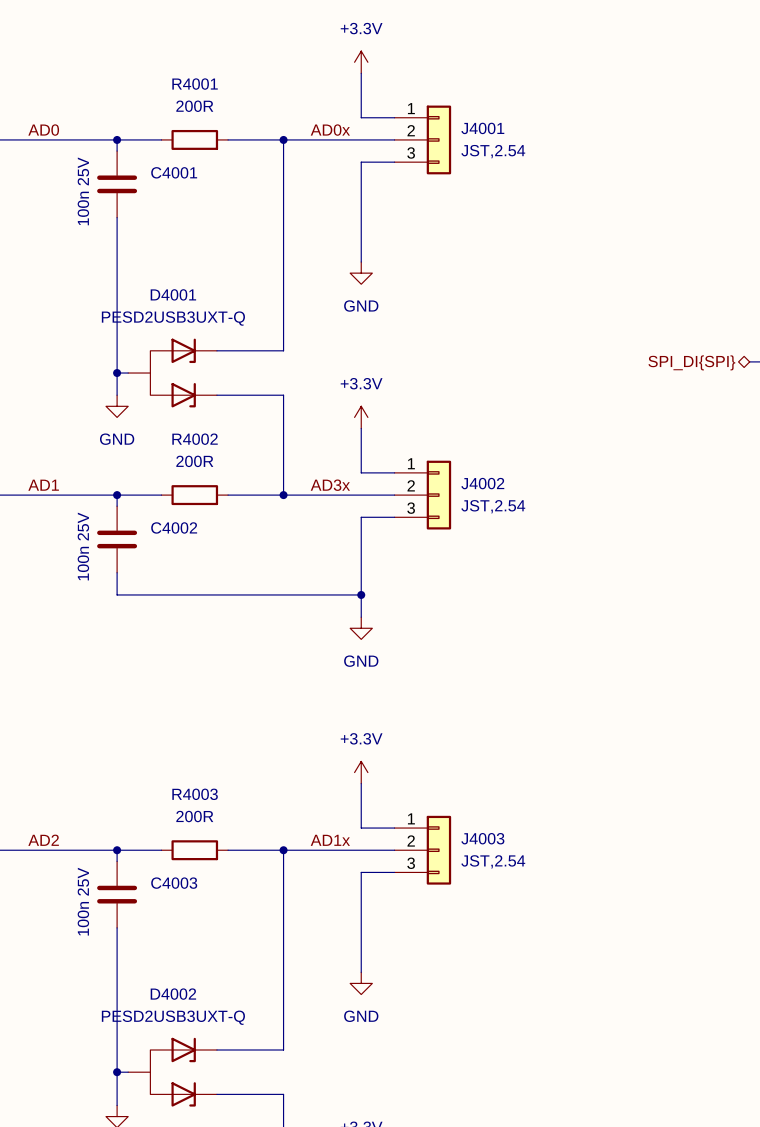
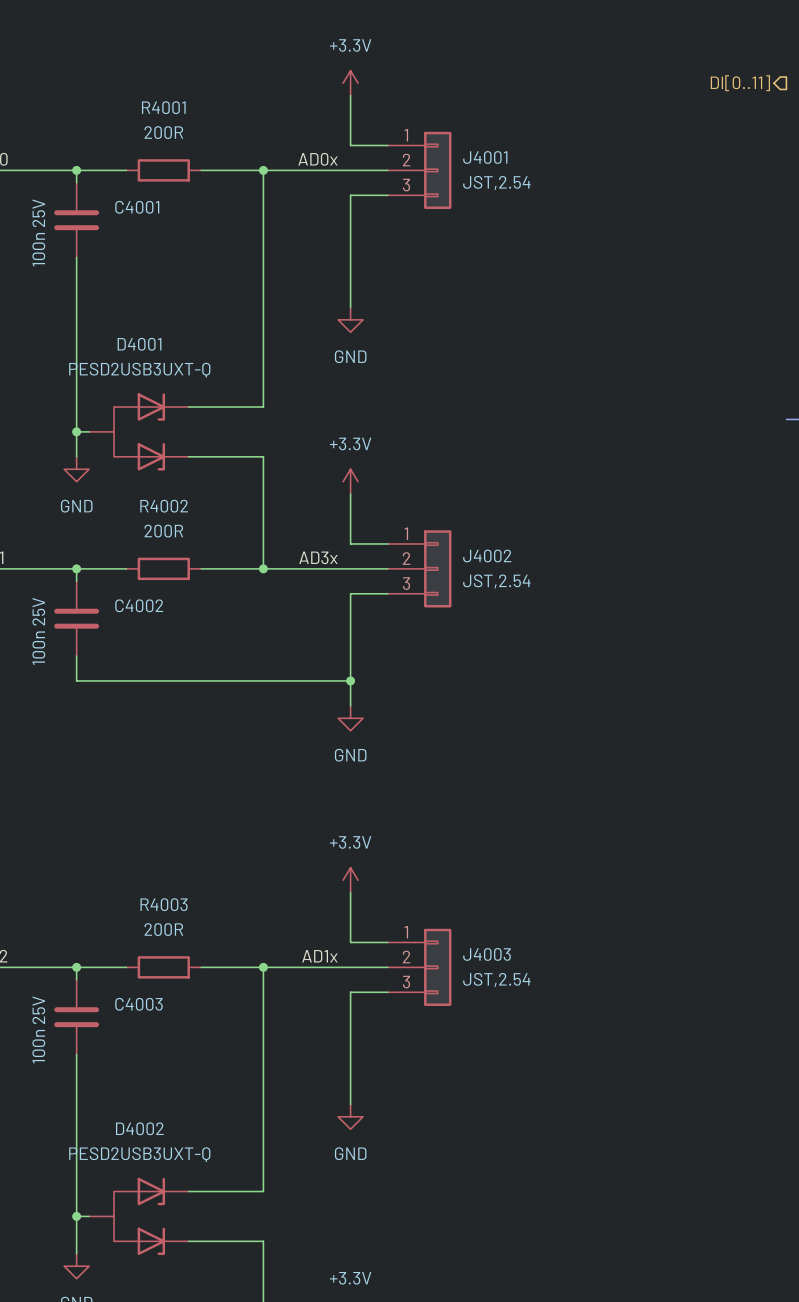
hierarchical label: none -> DI[0..11] (740, 83)
hierarchical label: SPI_DI{SPI} (691, 362) -> none

